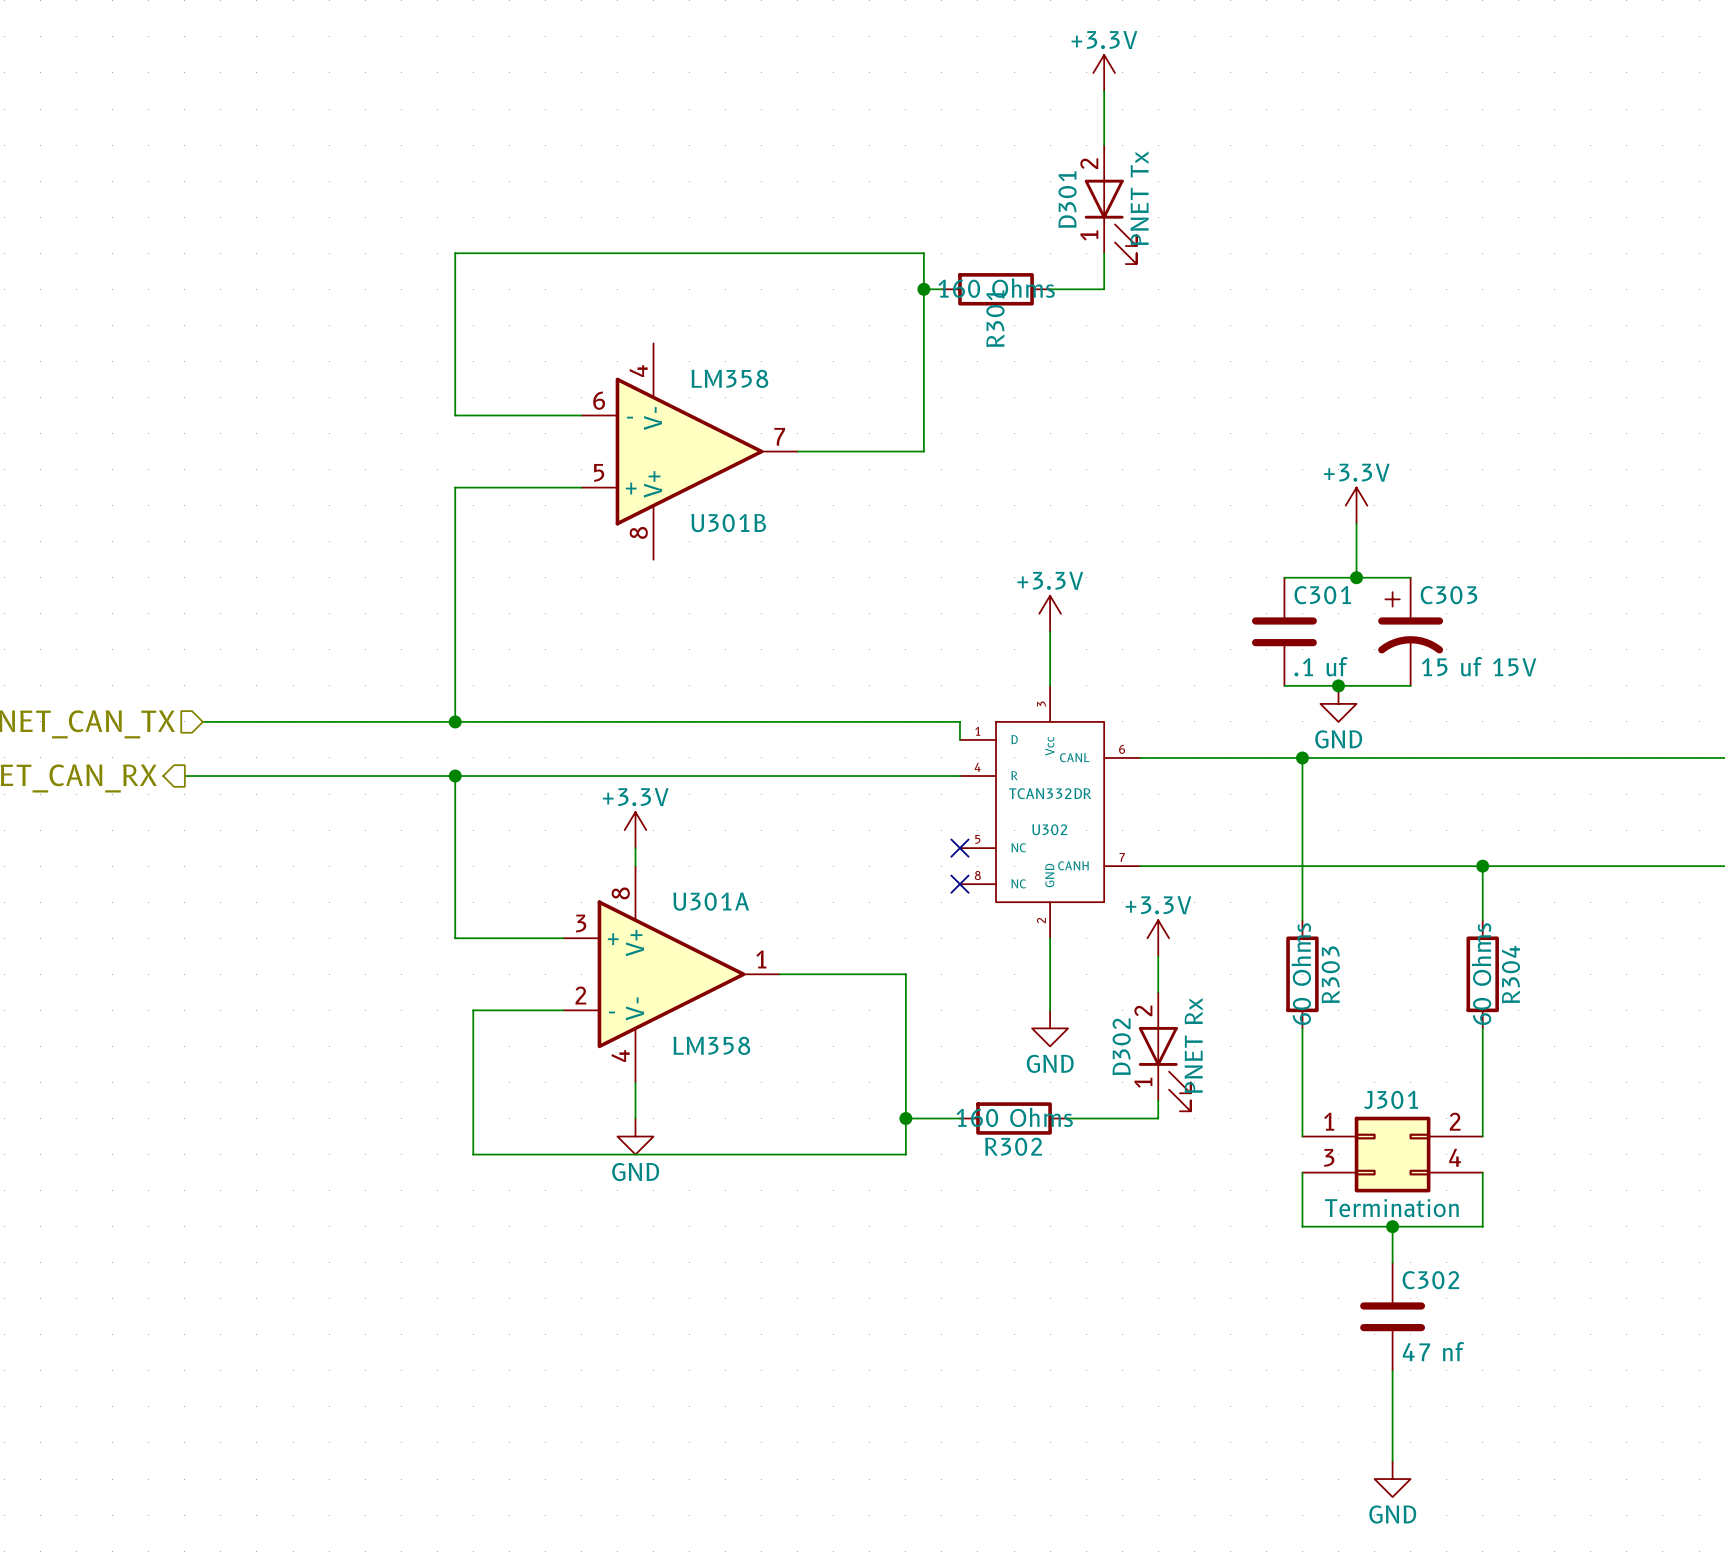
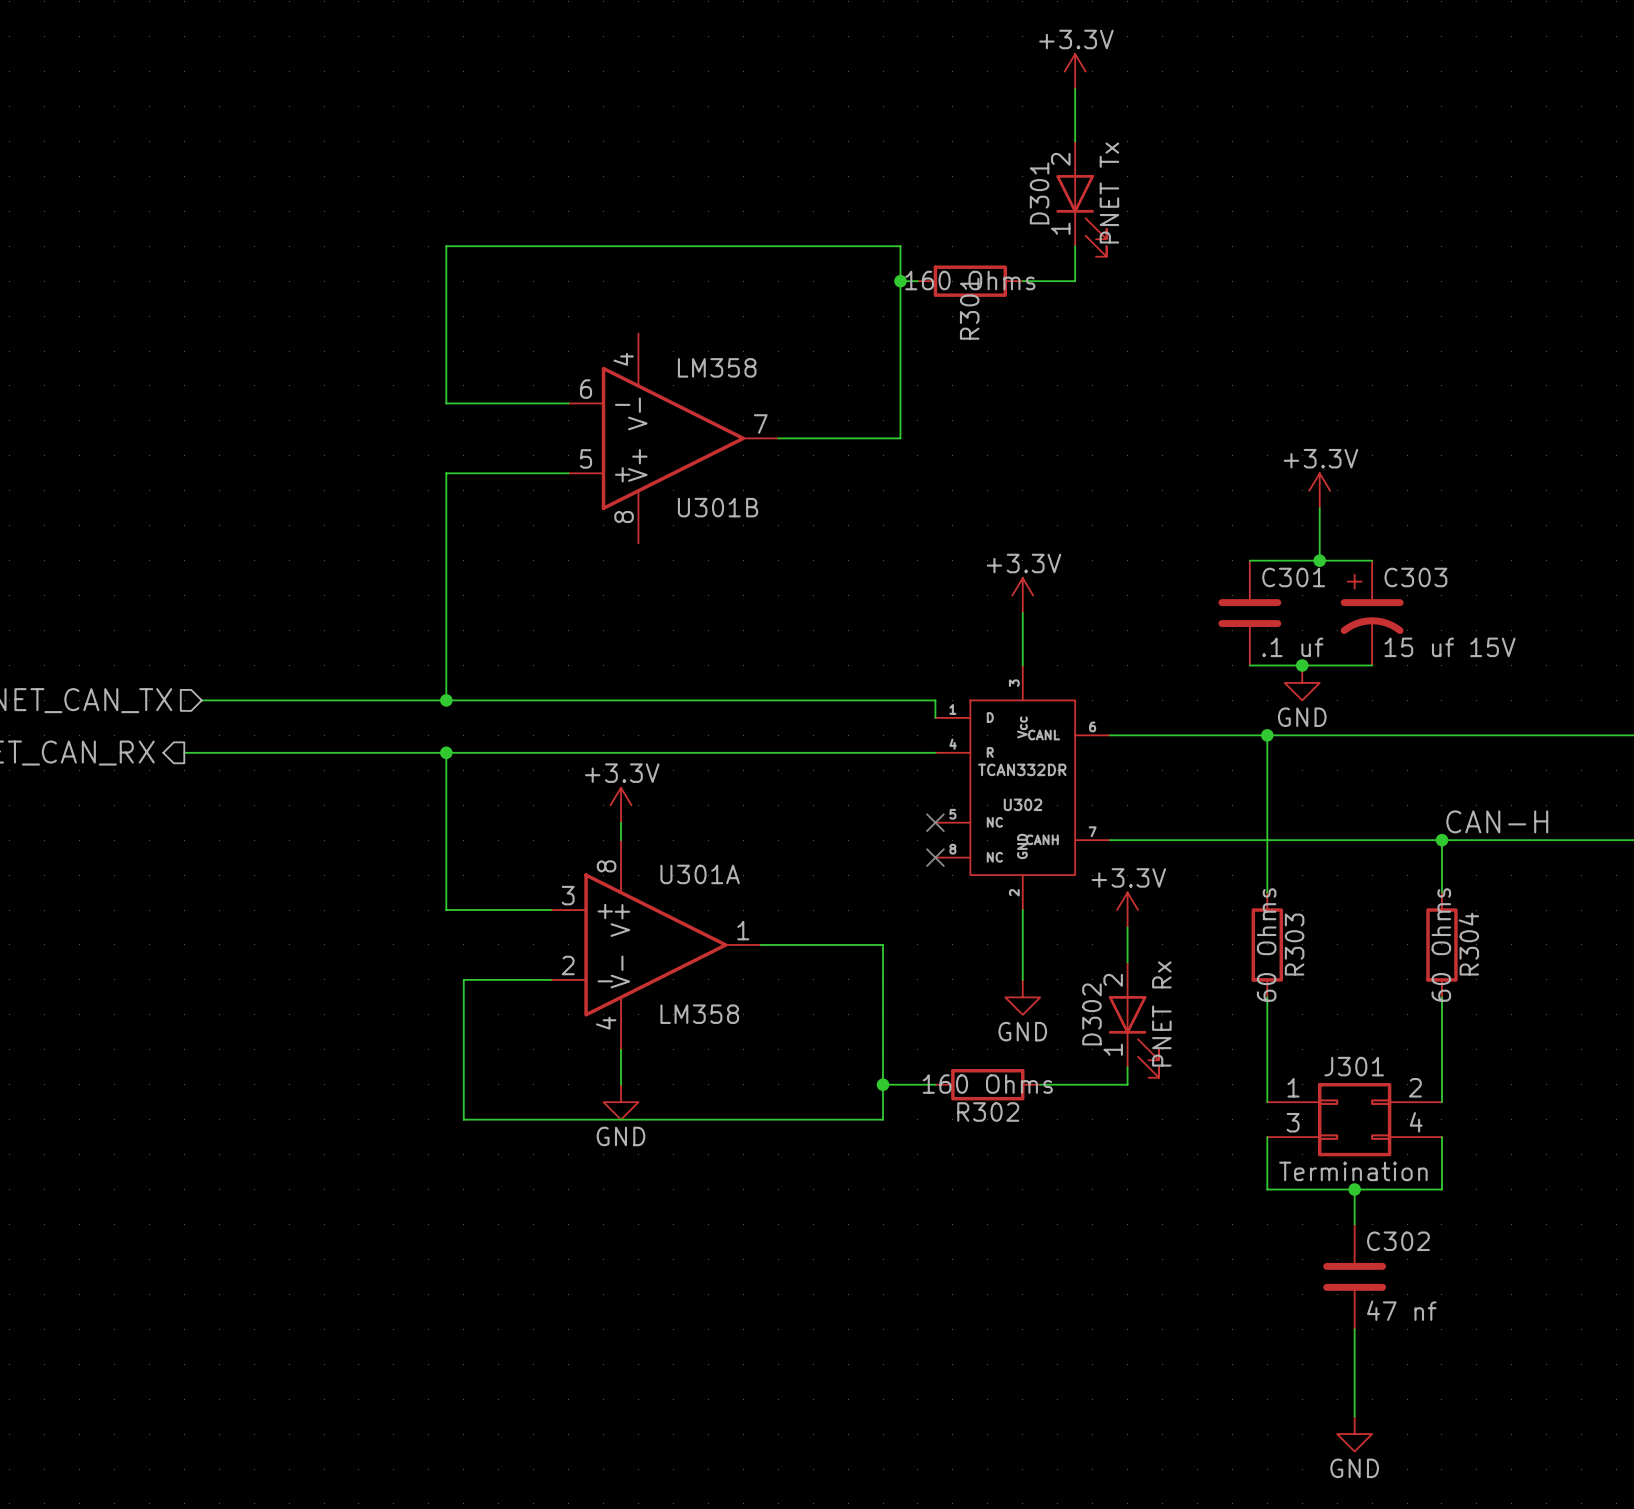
label: none -> CAN-H (1497, 821)

